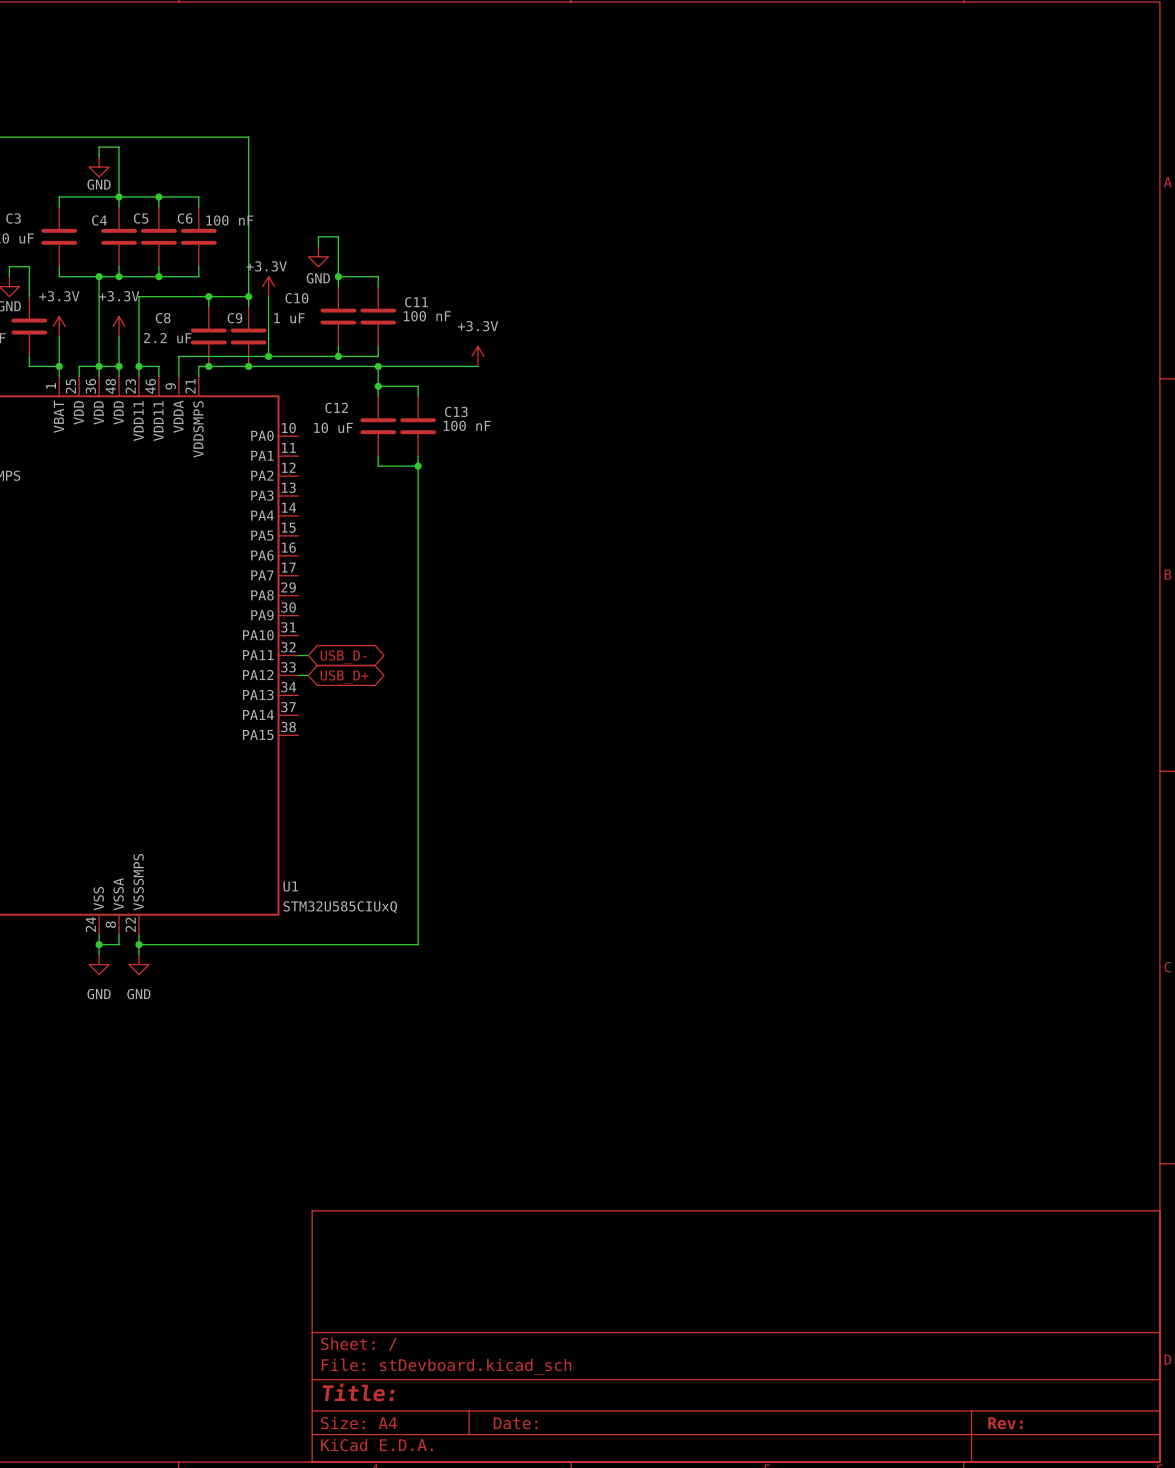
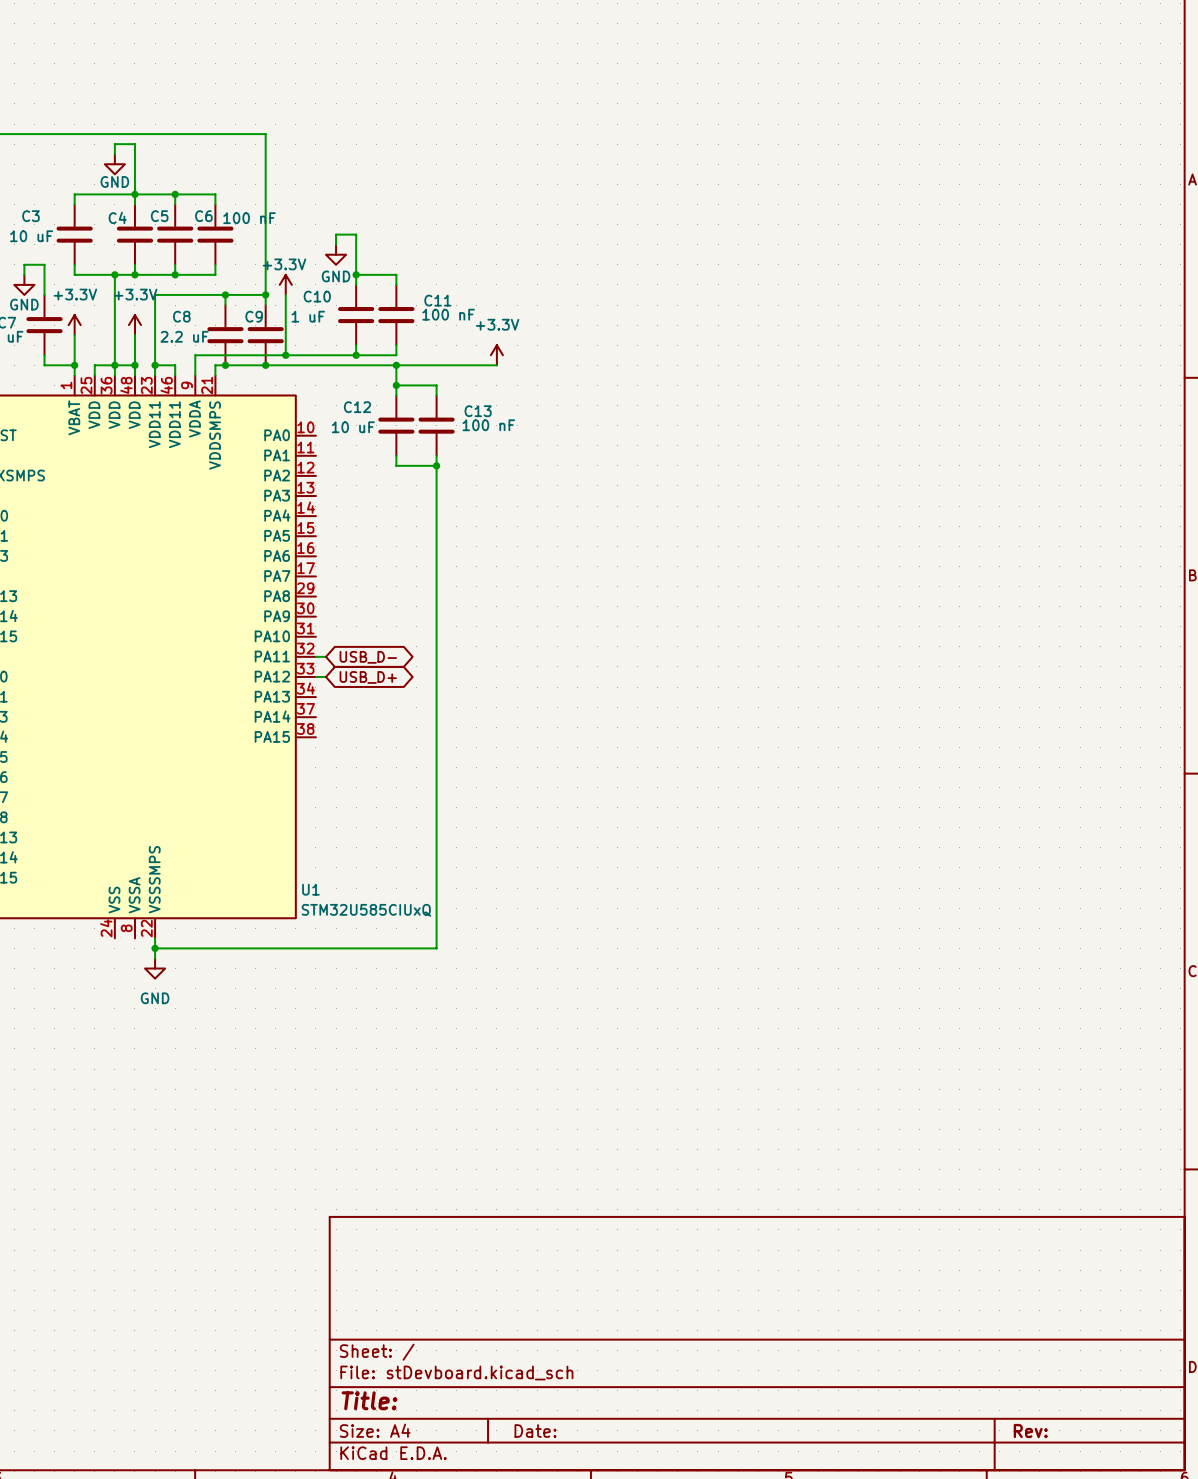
wire: (99, 934) (99, 954) -> none
wire: (119, 934) (119, 944) (99, 944) -> none
junction: (99, 944) -> none
power symbol: GND (99, 964) -> none

